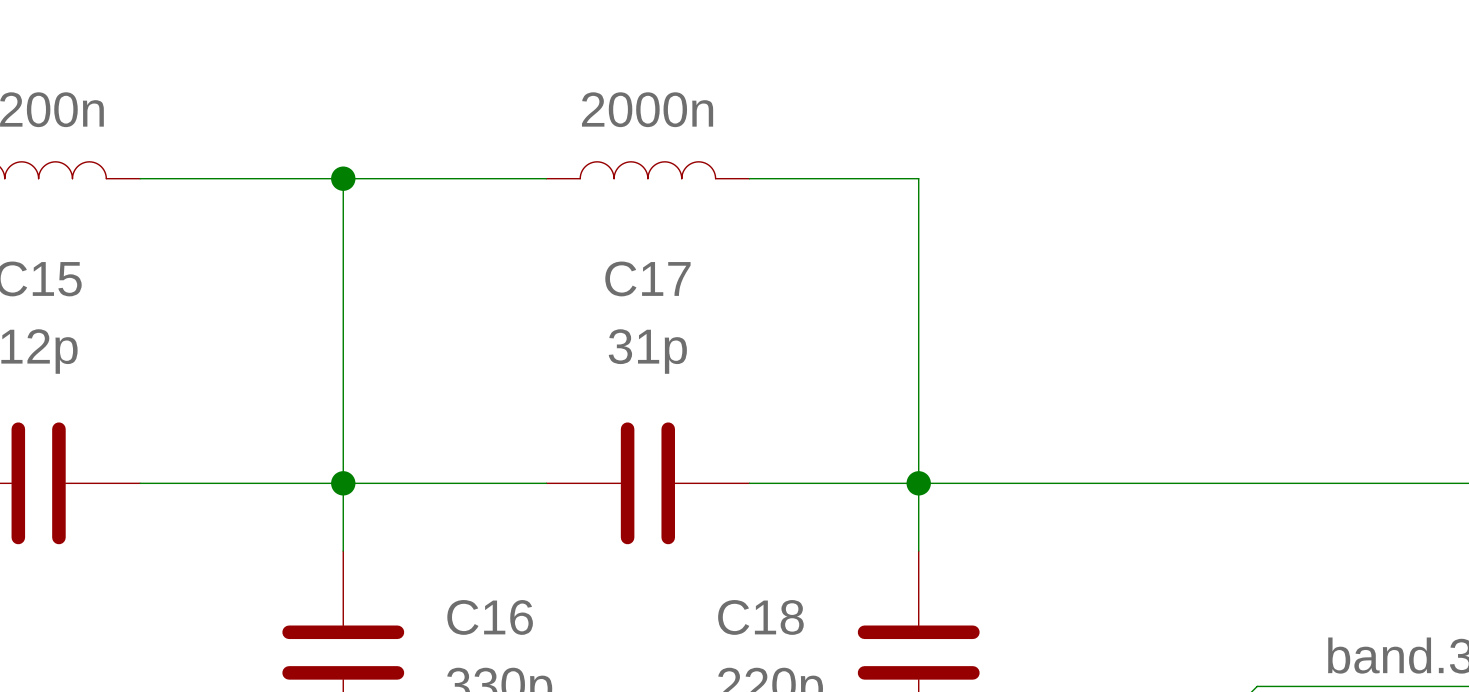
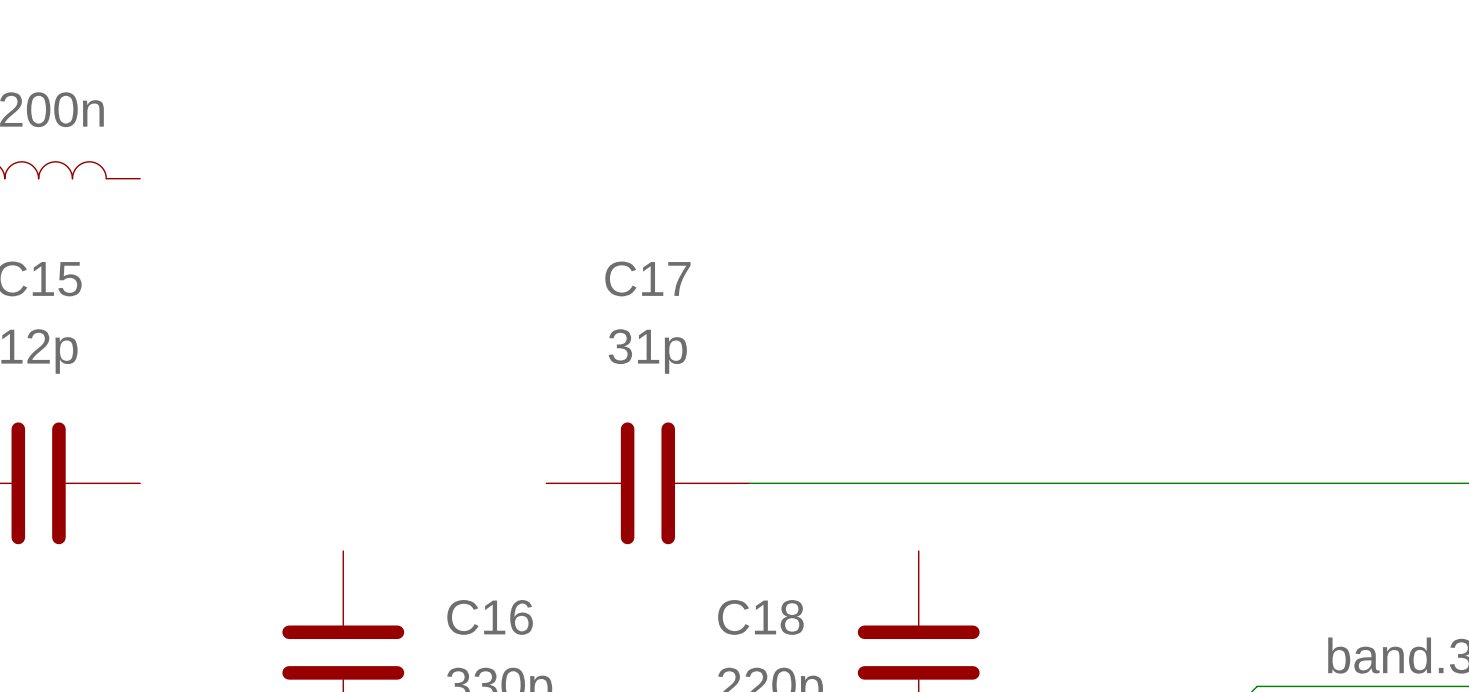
part: 2000n (647, 170) -> none
wire: (140, 178) (546, 178) -> none
wire: (343, 178) (343, 551) -> none
junction: (343, 178) -> none
wire: (749, 178) (918, 178) (918, 551) -> none
wire: (140, 483) (546, 483) -> none
junction: (343, 483) -> none
junction: (918, 483) -> none

